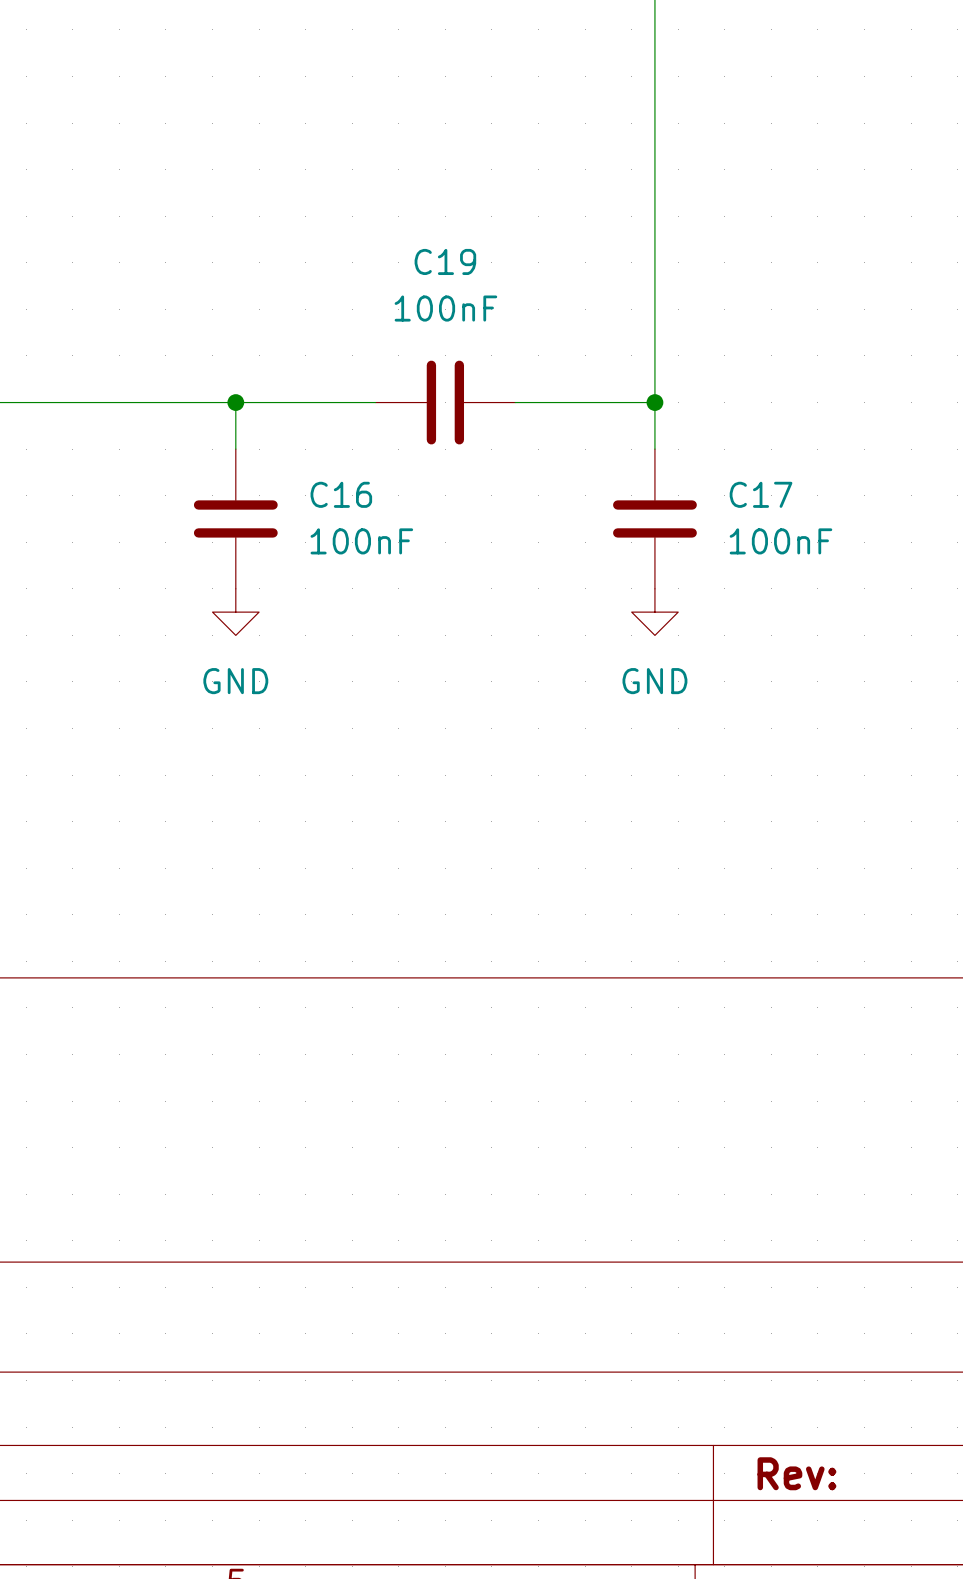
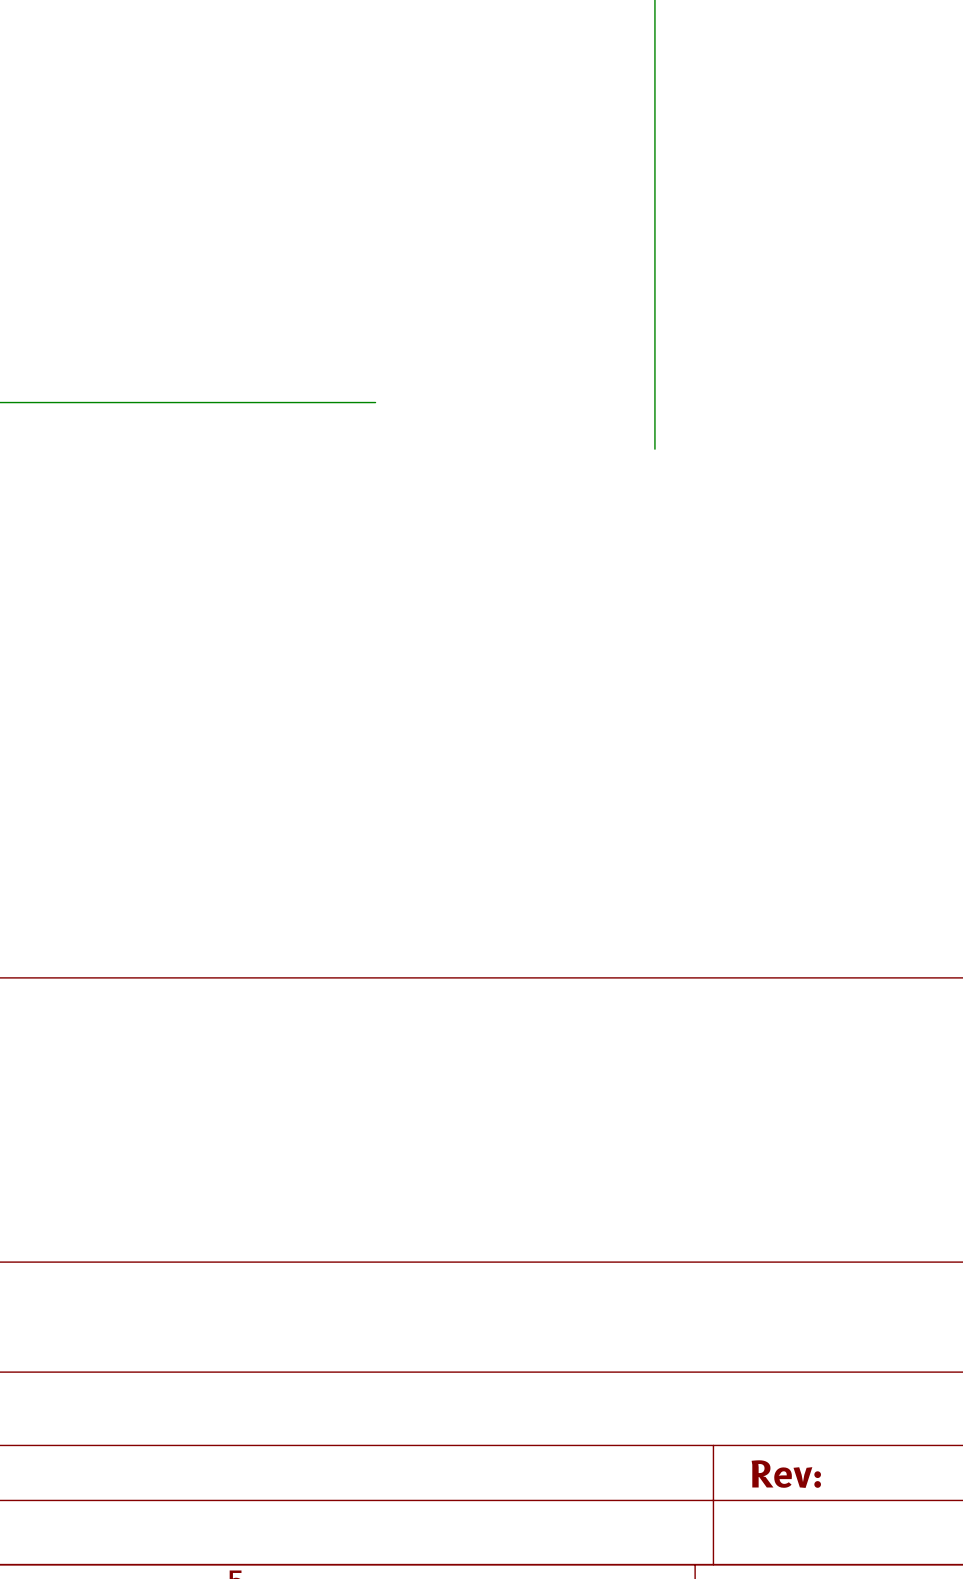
wire: (235, 402) (235, 449) -> none
junction: (235, 402) -> none
C19: 100nF (445, 402) -> none
wire: (515, 402) (654, 402) -> none
junction: (654, 402) -> none
C16: 100nF (235, 518) -> none
C17: 100nF (654, 518) -> none
power symbol: GND (235, 612) -> none
power symbol: GND (654, 612) -> none

